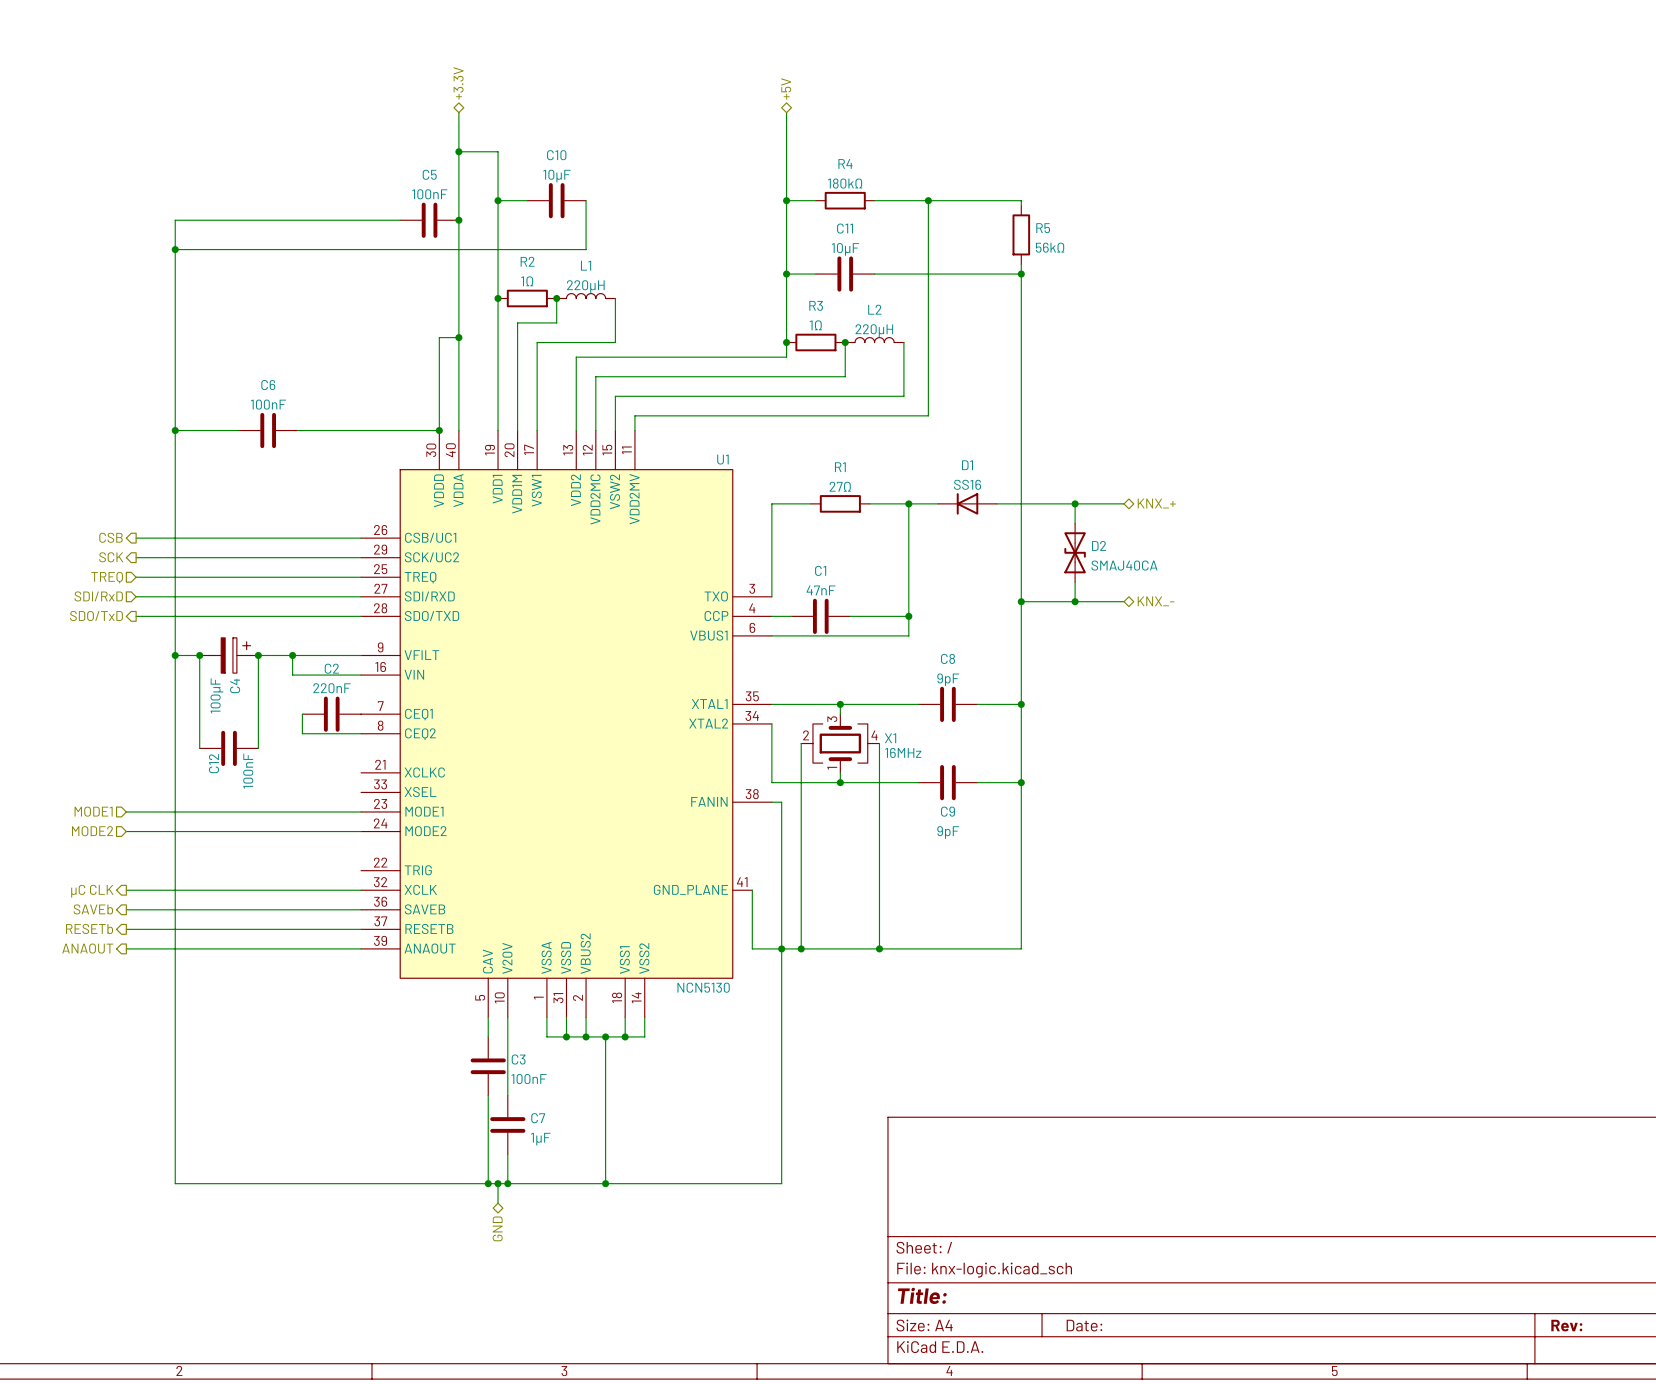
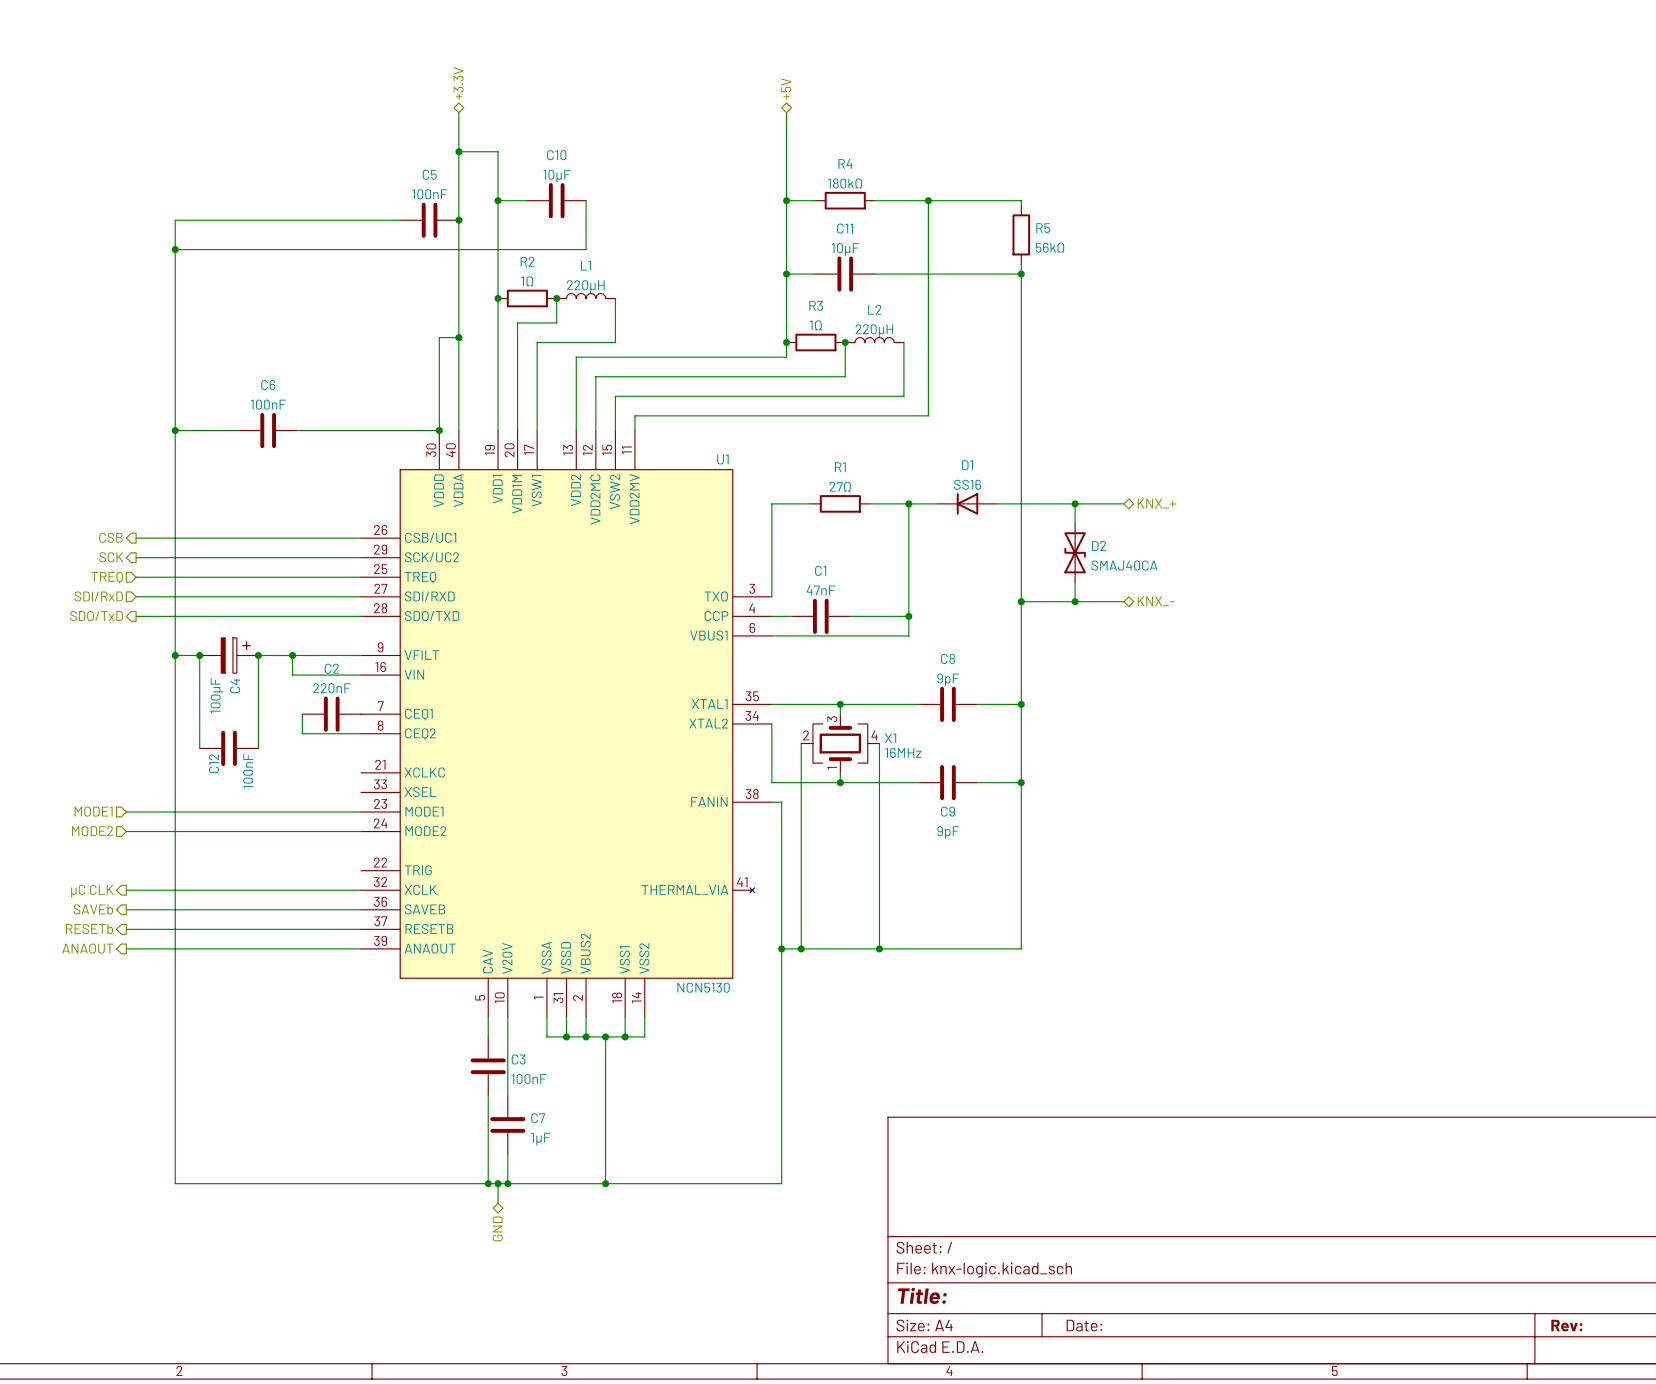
U1 symbol: [361, 430, 772, 1018] -> [361, 430, 772, 1018]
wire: (752, 890) (752, 948) (781, 948) -> none

